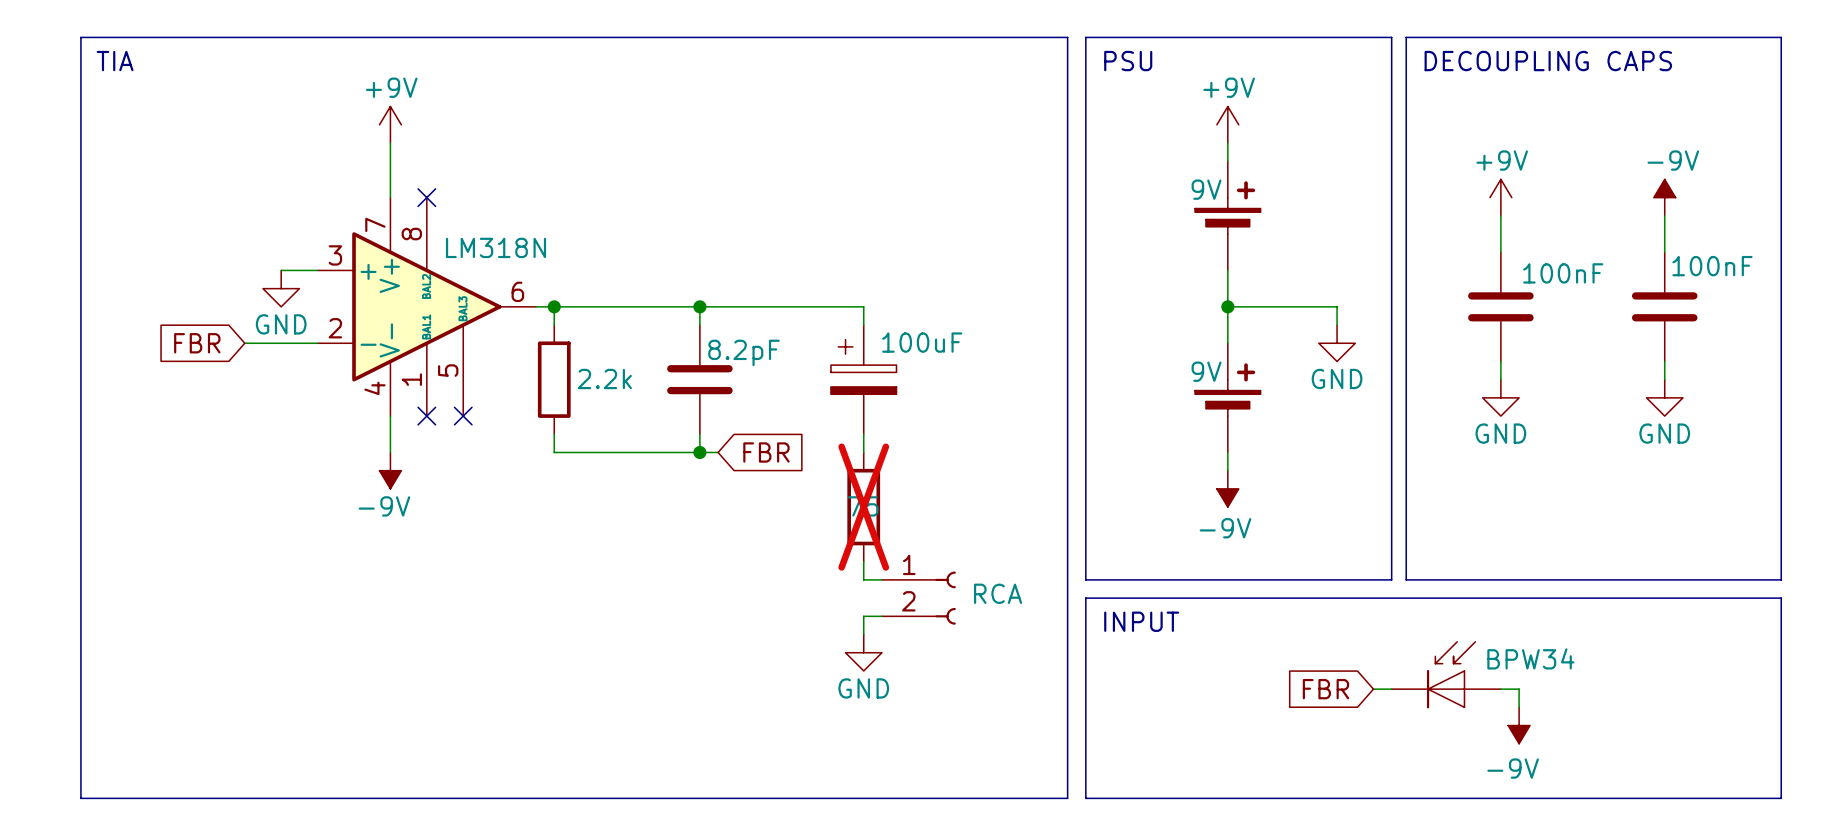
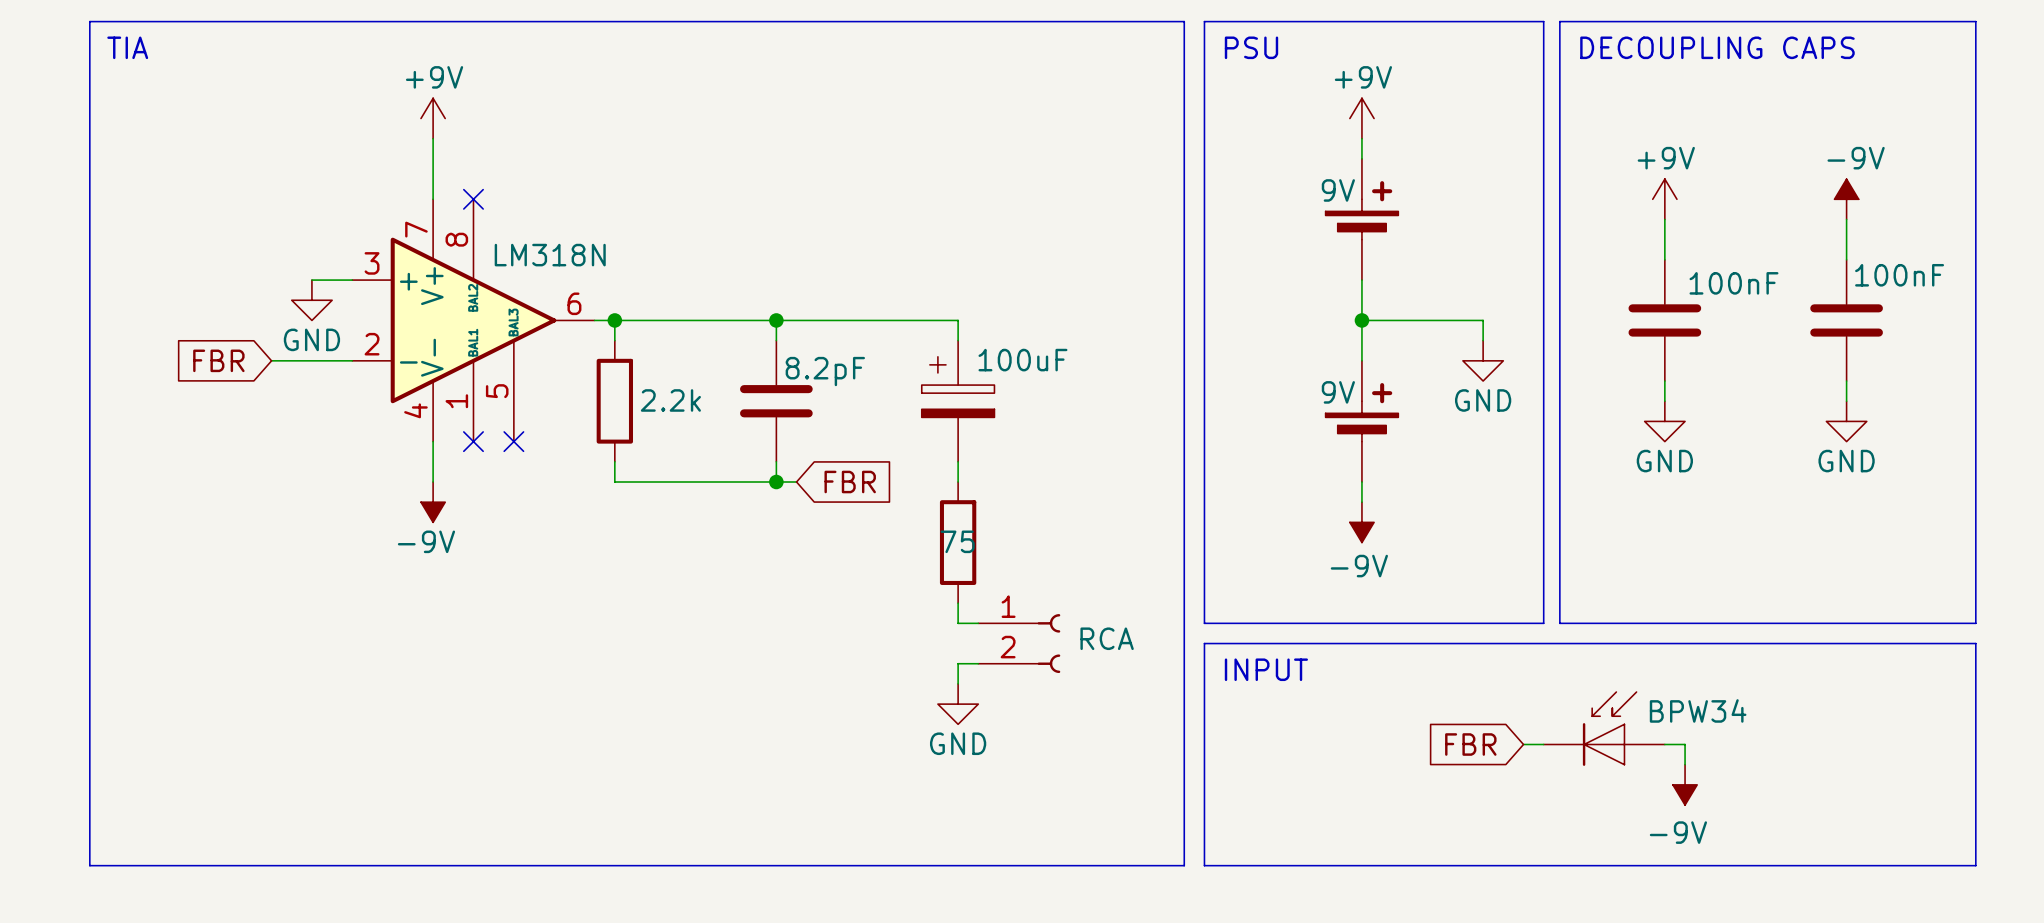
part do-not-place cross: (863, 507) -> none

